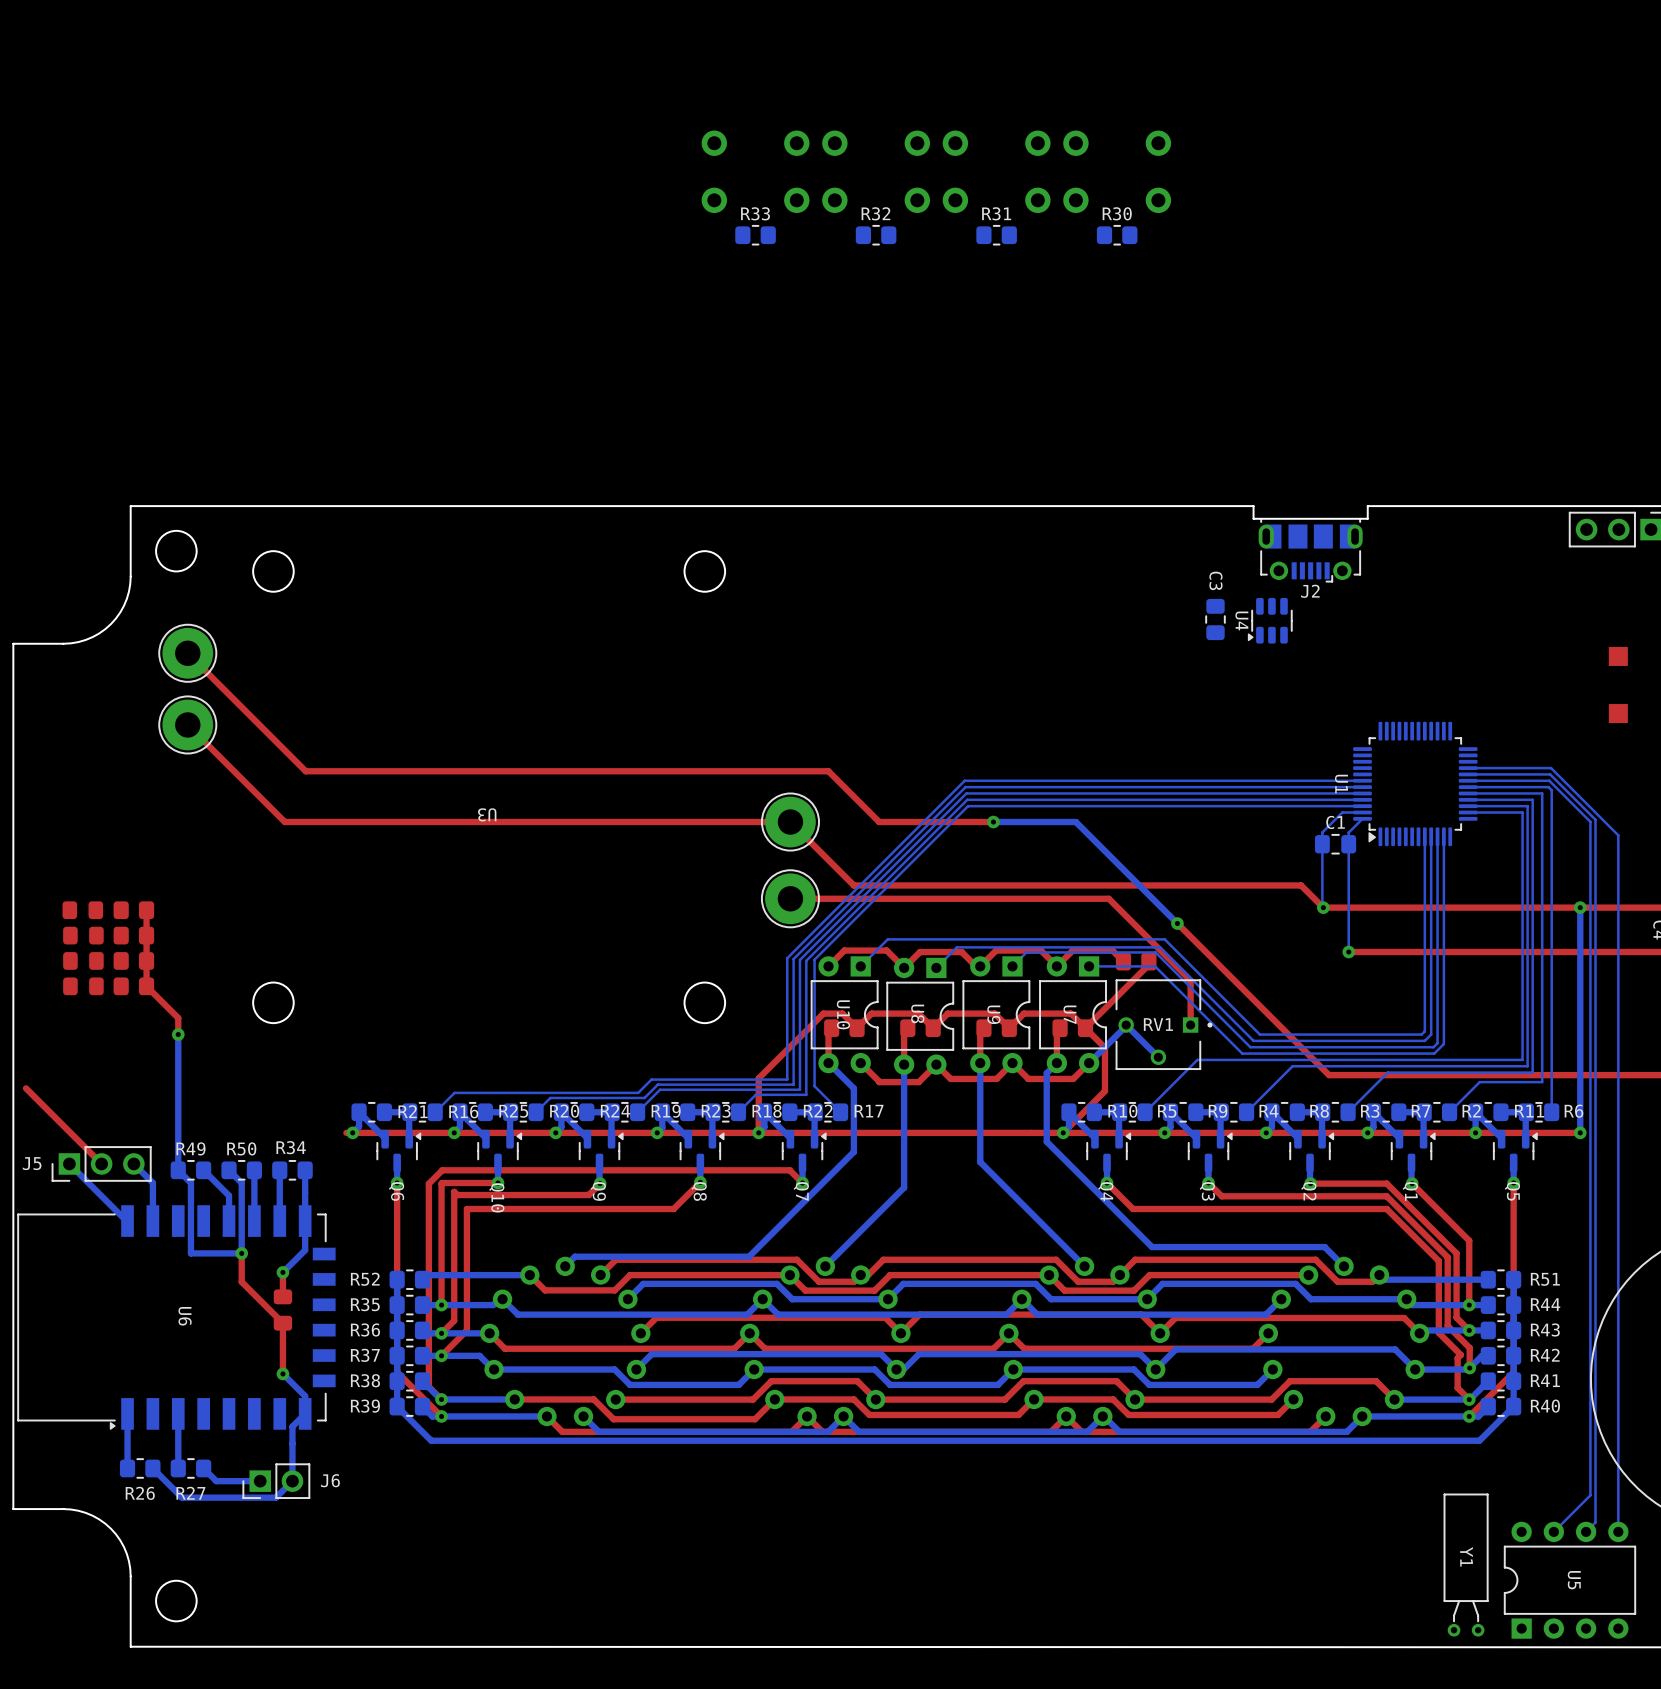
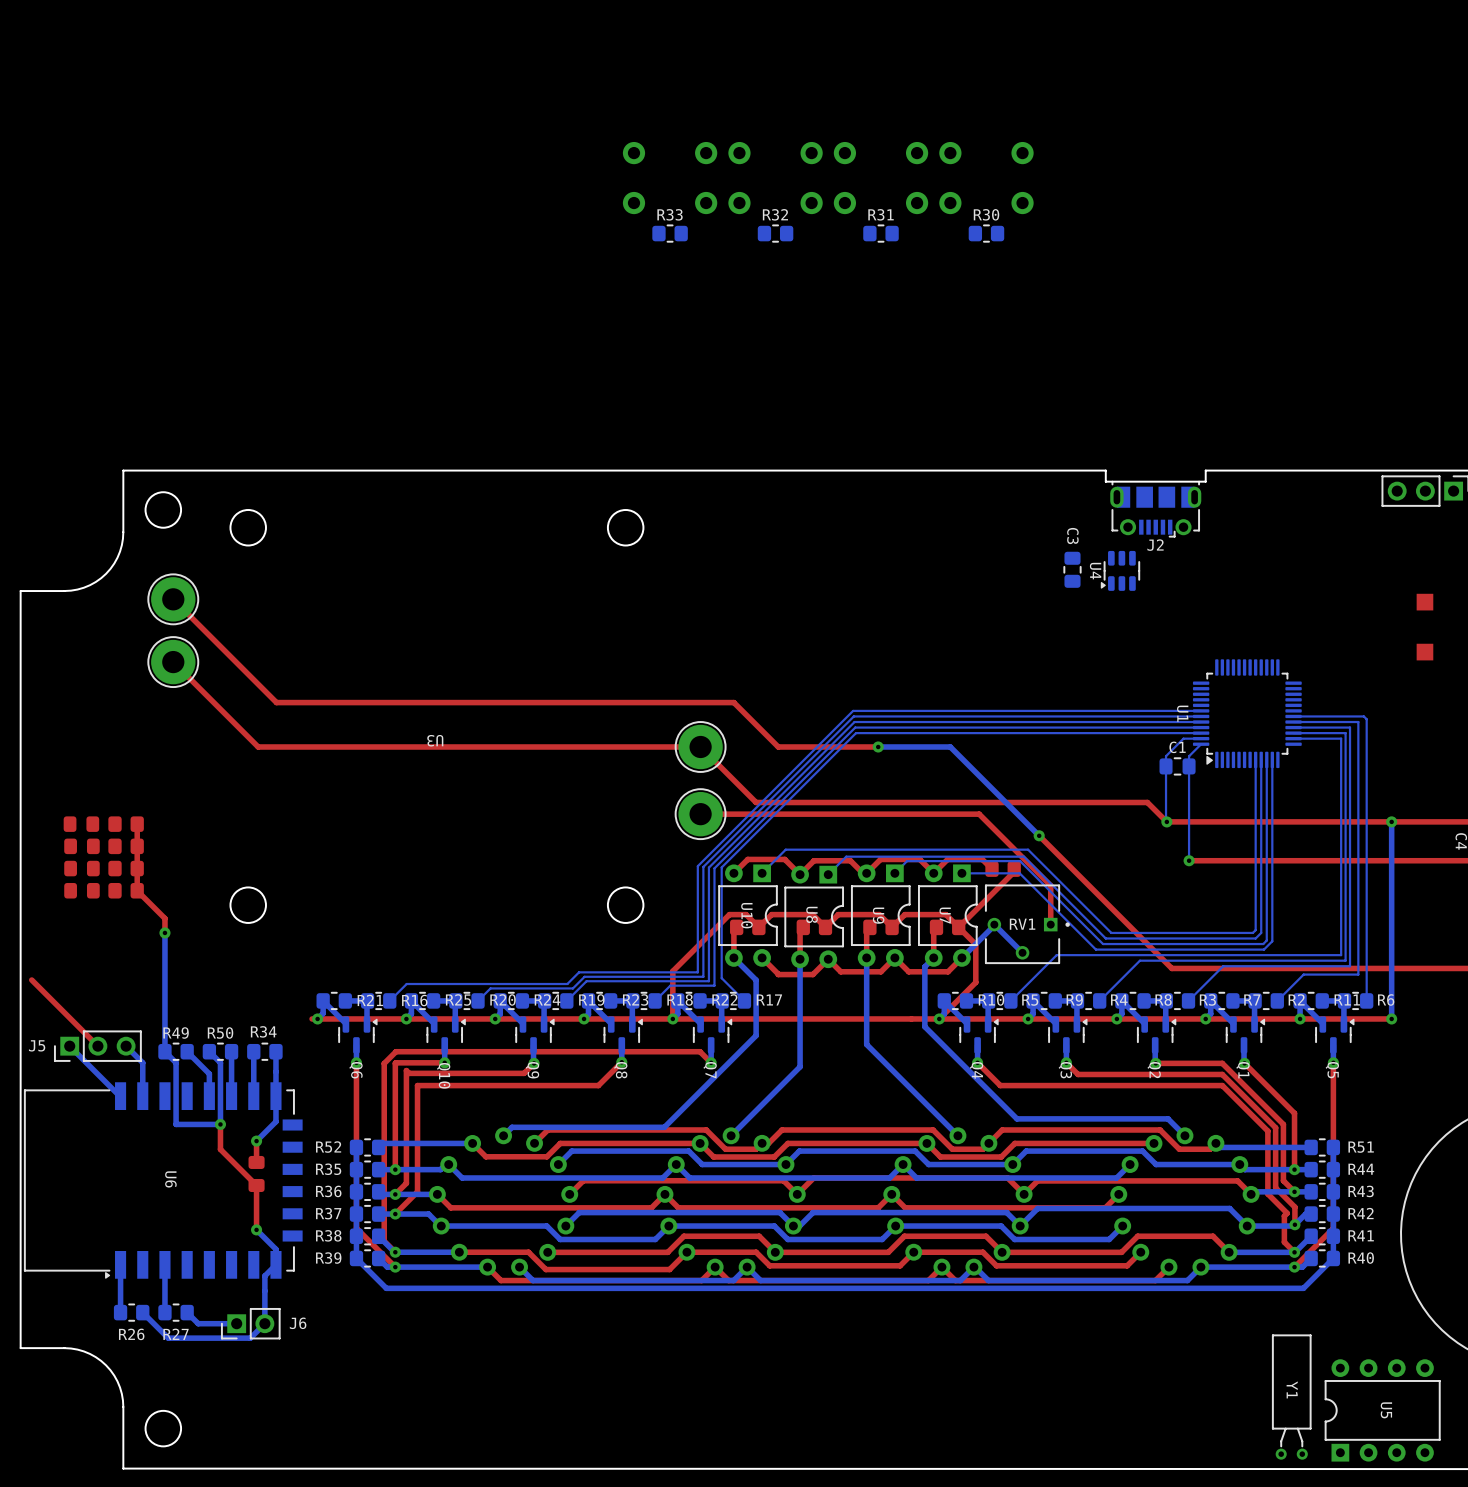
bottom track: (1468, 768) (1551, 768) (1618, 835) (1618, 1531) -> none
bottom track: (1468, 774) (1550, 774) (1595, 819) (1595, 1522) (1586, 1531) -> none
bottom track: (1468, 780) (1549, 780) (1590, 821) (1590, 1495) (1553, 1531) -> none

